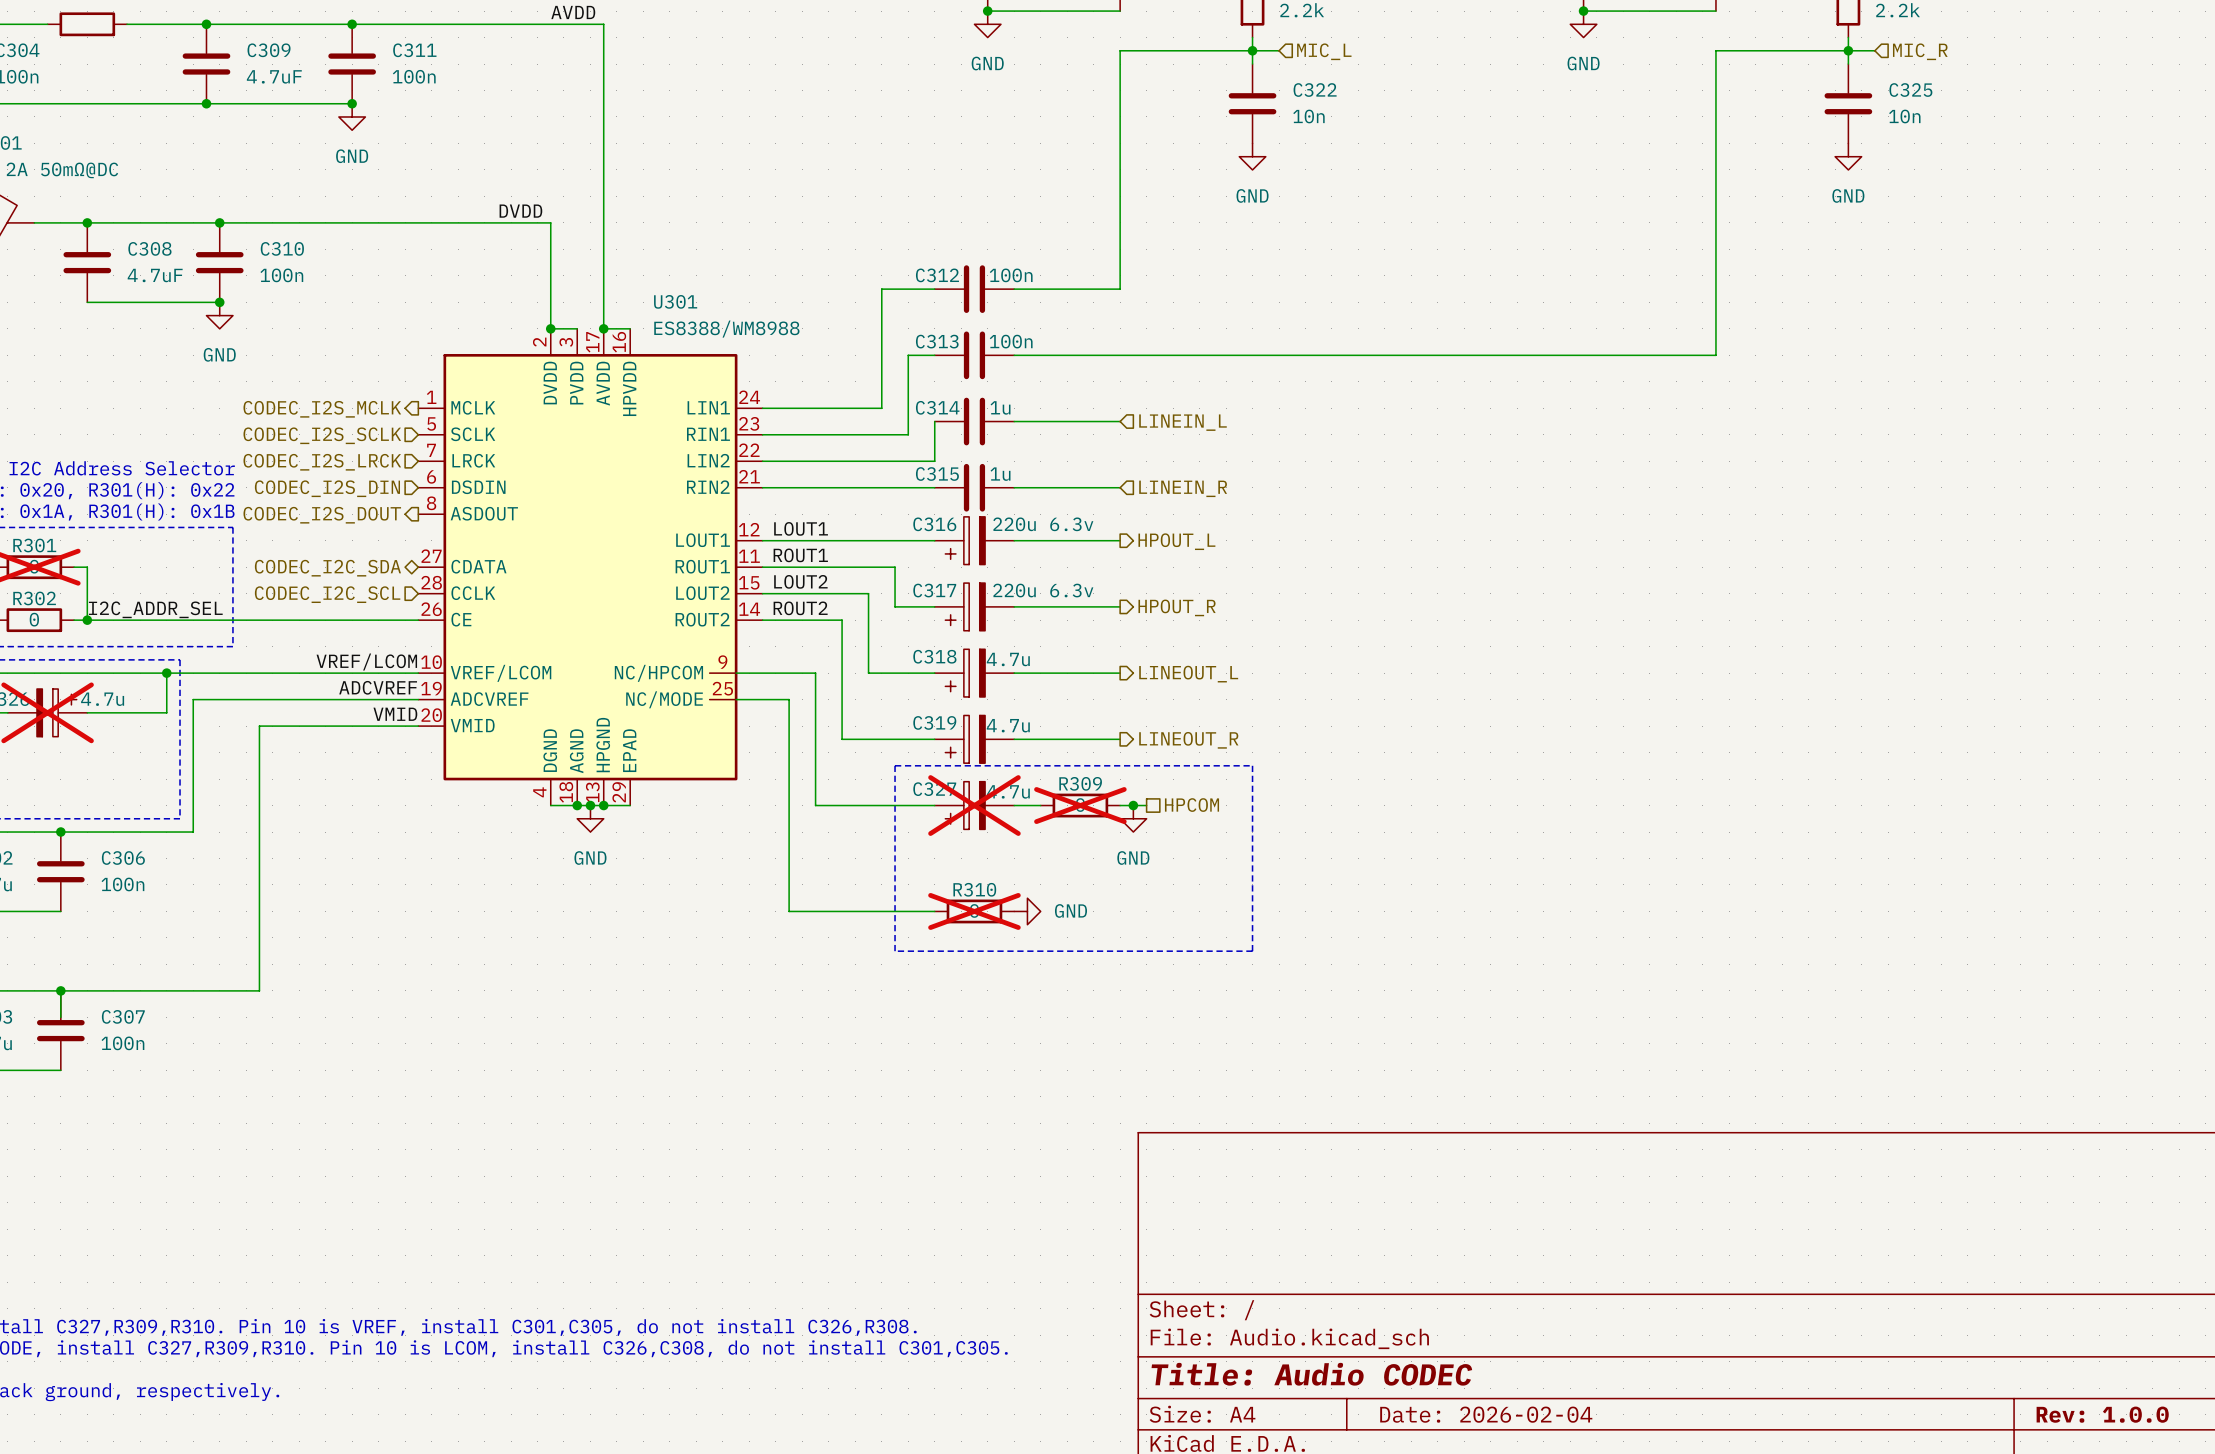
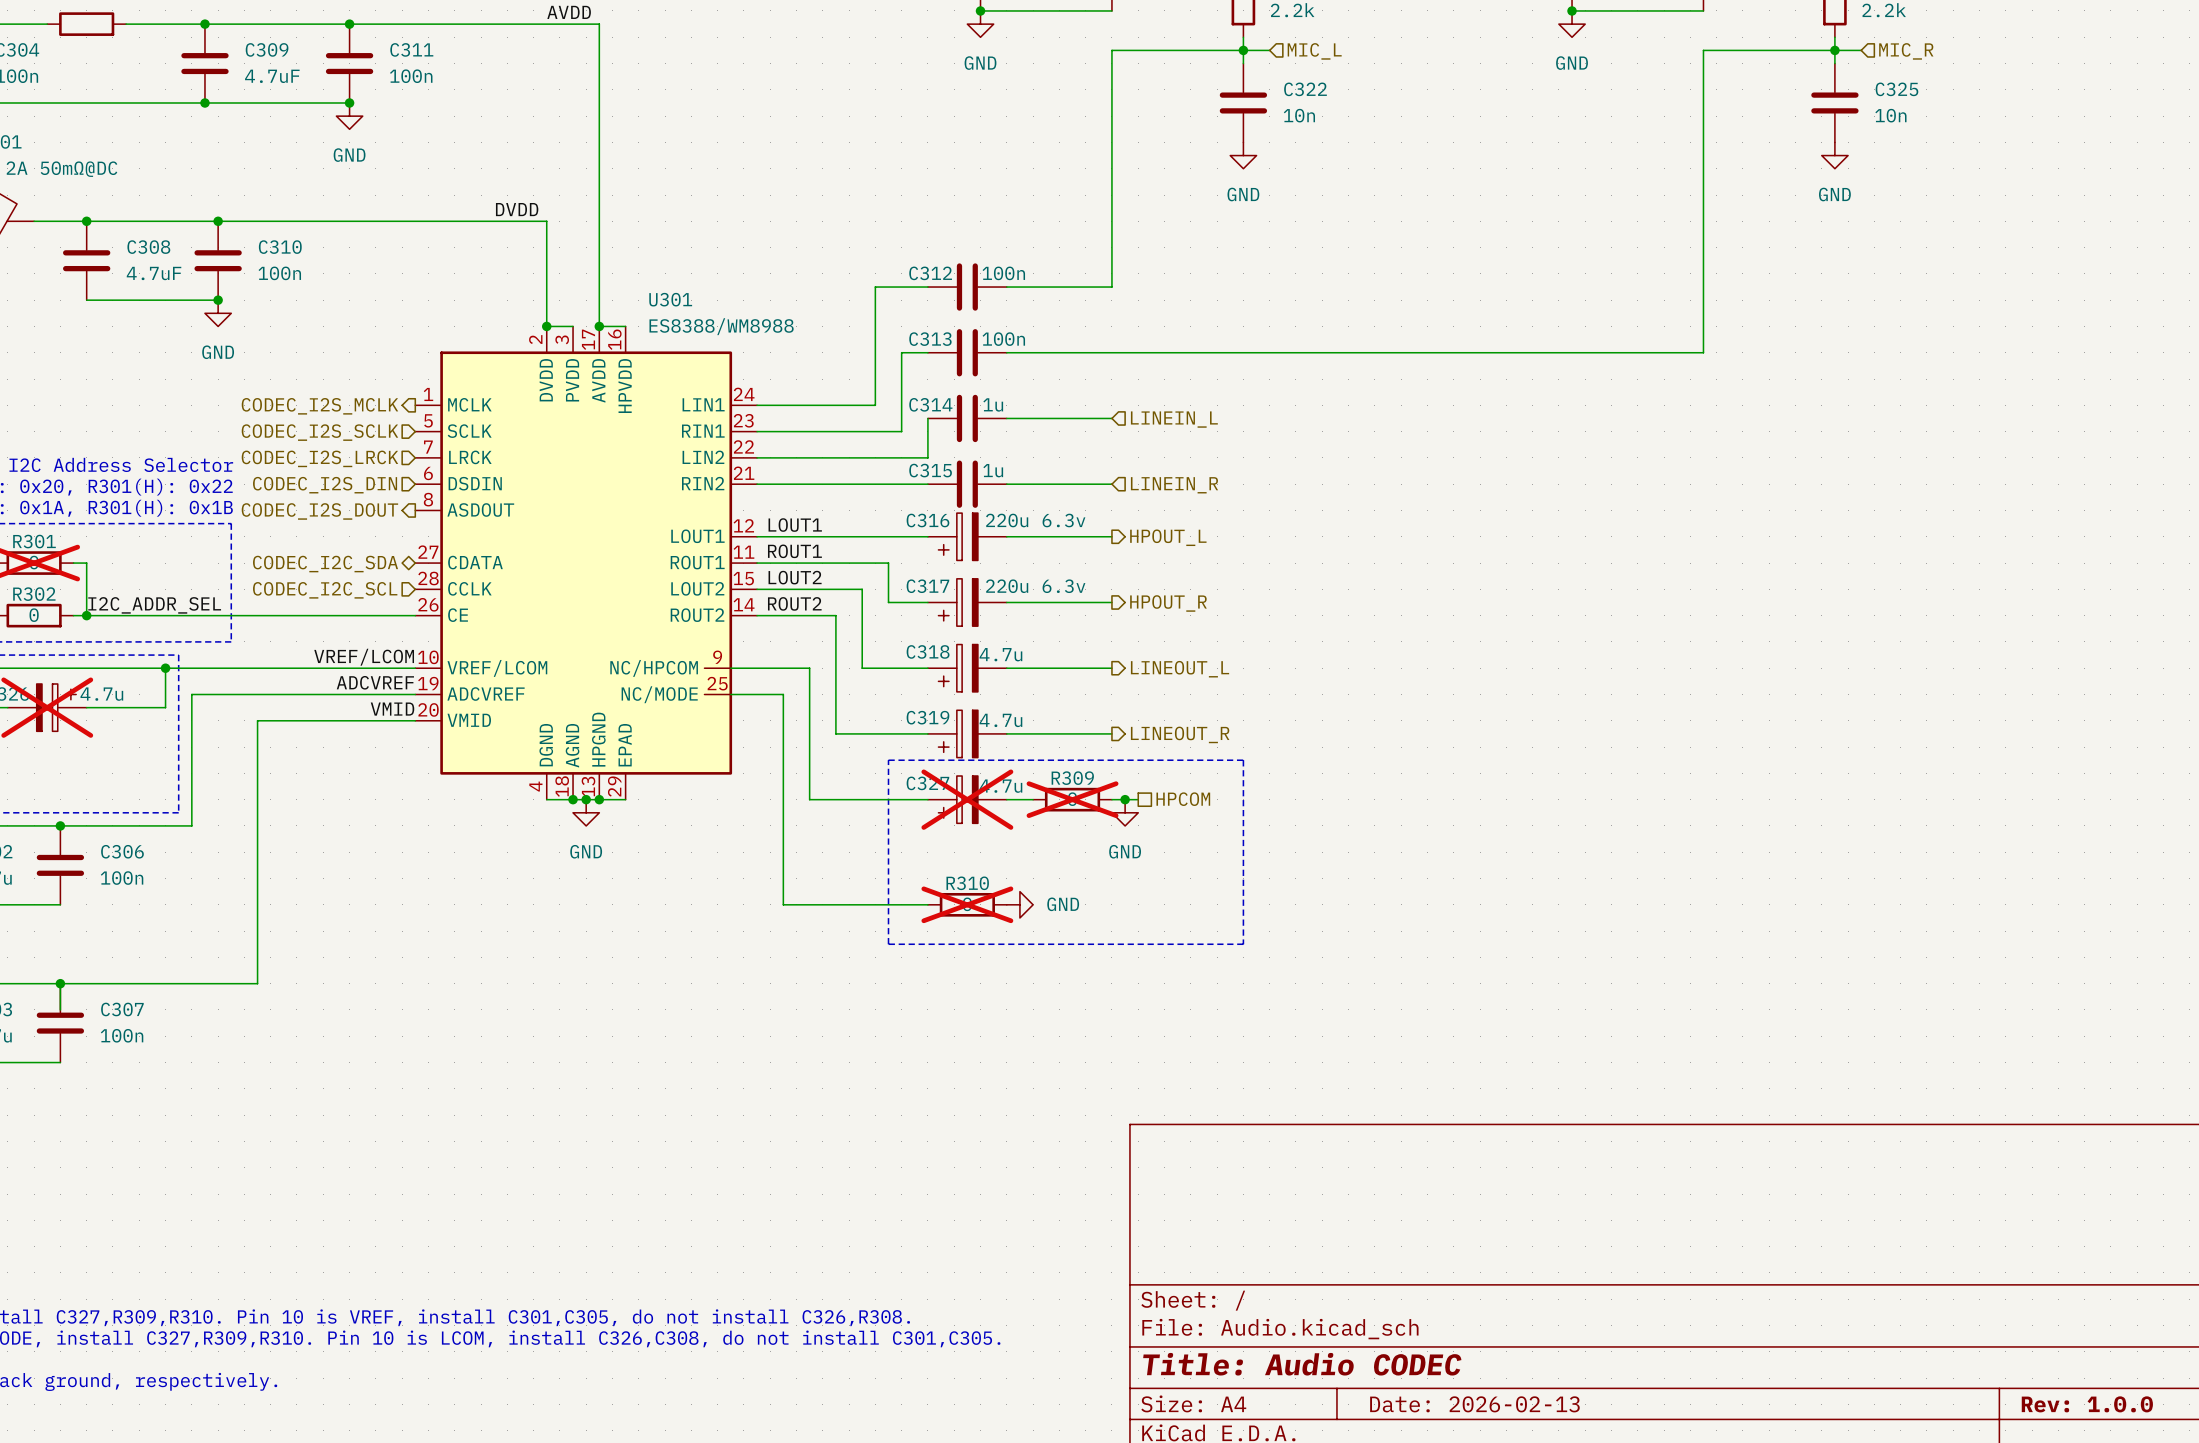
title block: Date: 2026-02-04 (1486, 1414) -> Date: 2026-02-13 (1474, 1404)

